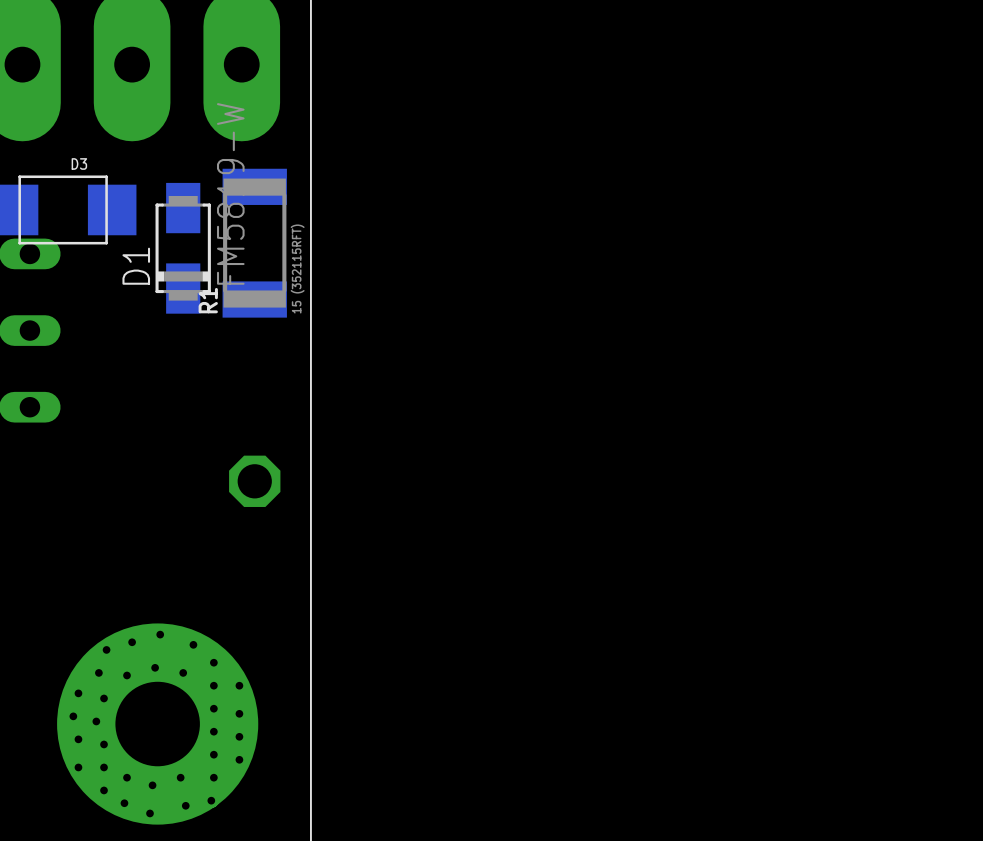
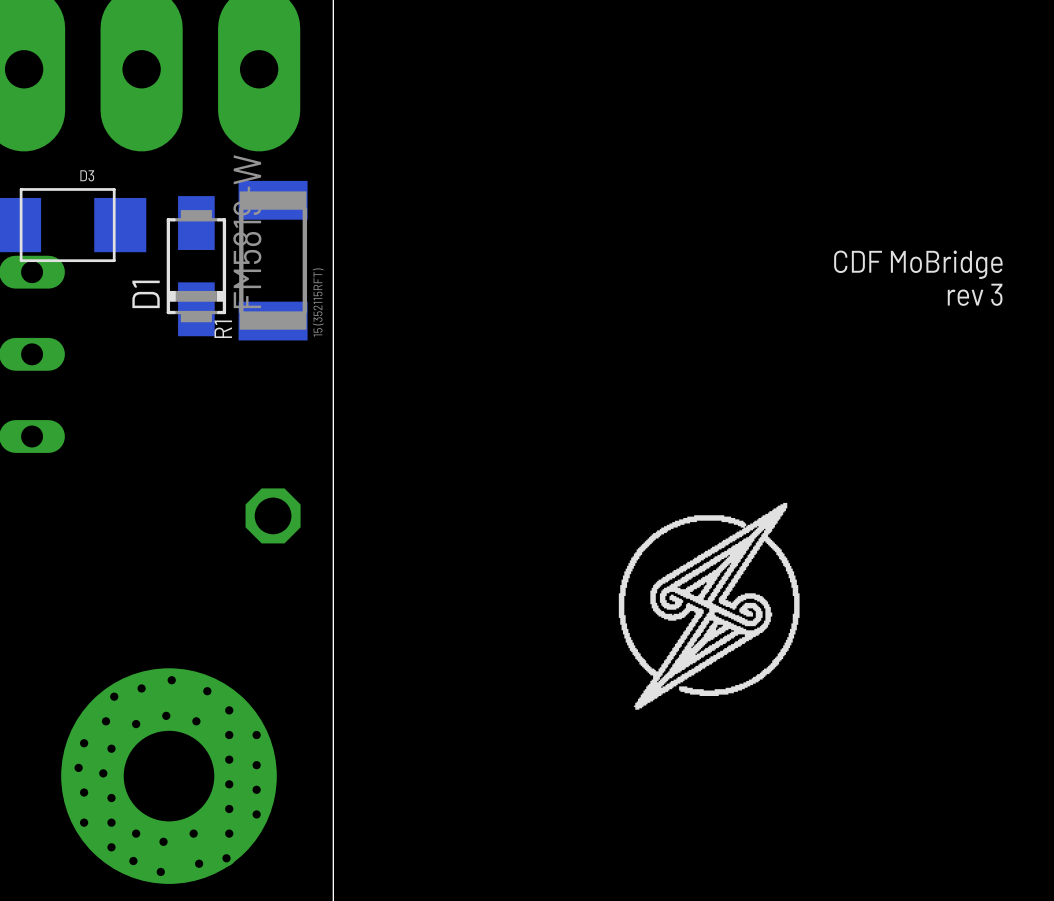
text: none -> CDF MoBridge (918, 264)
text: none -> rev 3 (975, 294)
drawing: none -> [618, 502, 800, 710]

